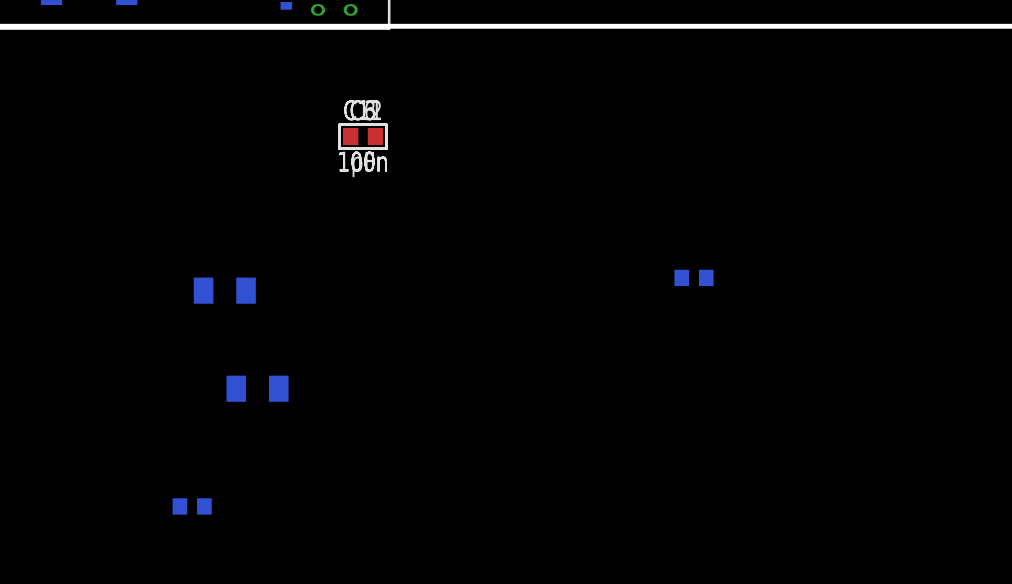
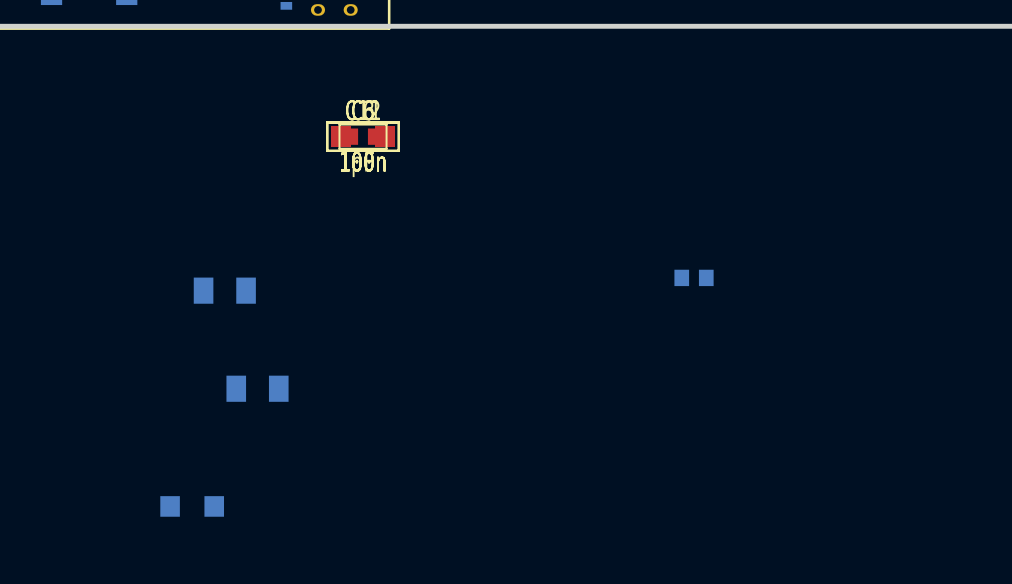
part footprint: [338, 123, 388, 150] -> [326, 121, 400, 152]
part footprint: [338, 123, 388, 150] -> [326, 121, 400, 152]
part footprint: [338, 123, 388, 150] -> [326, 121, 400, 152]
part footprint: [172, 498, 212, 515] -> [160, 496, 225, 517]

